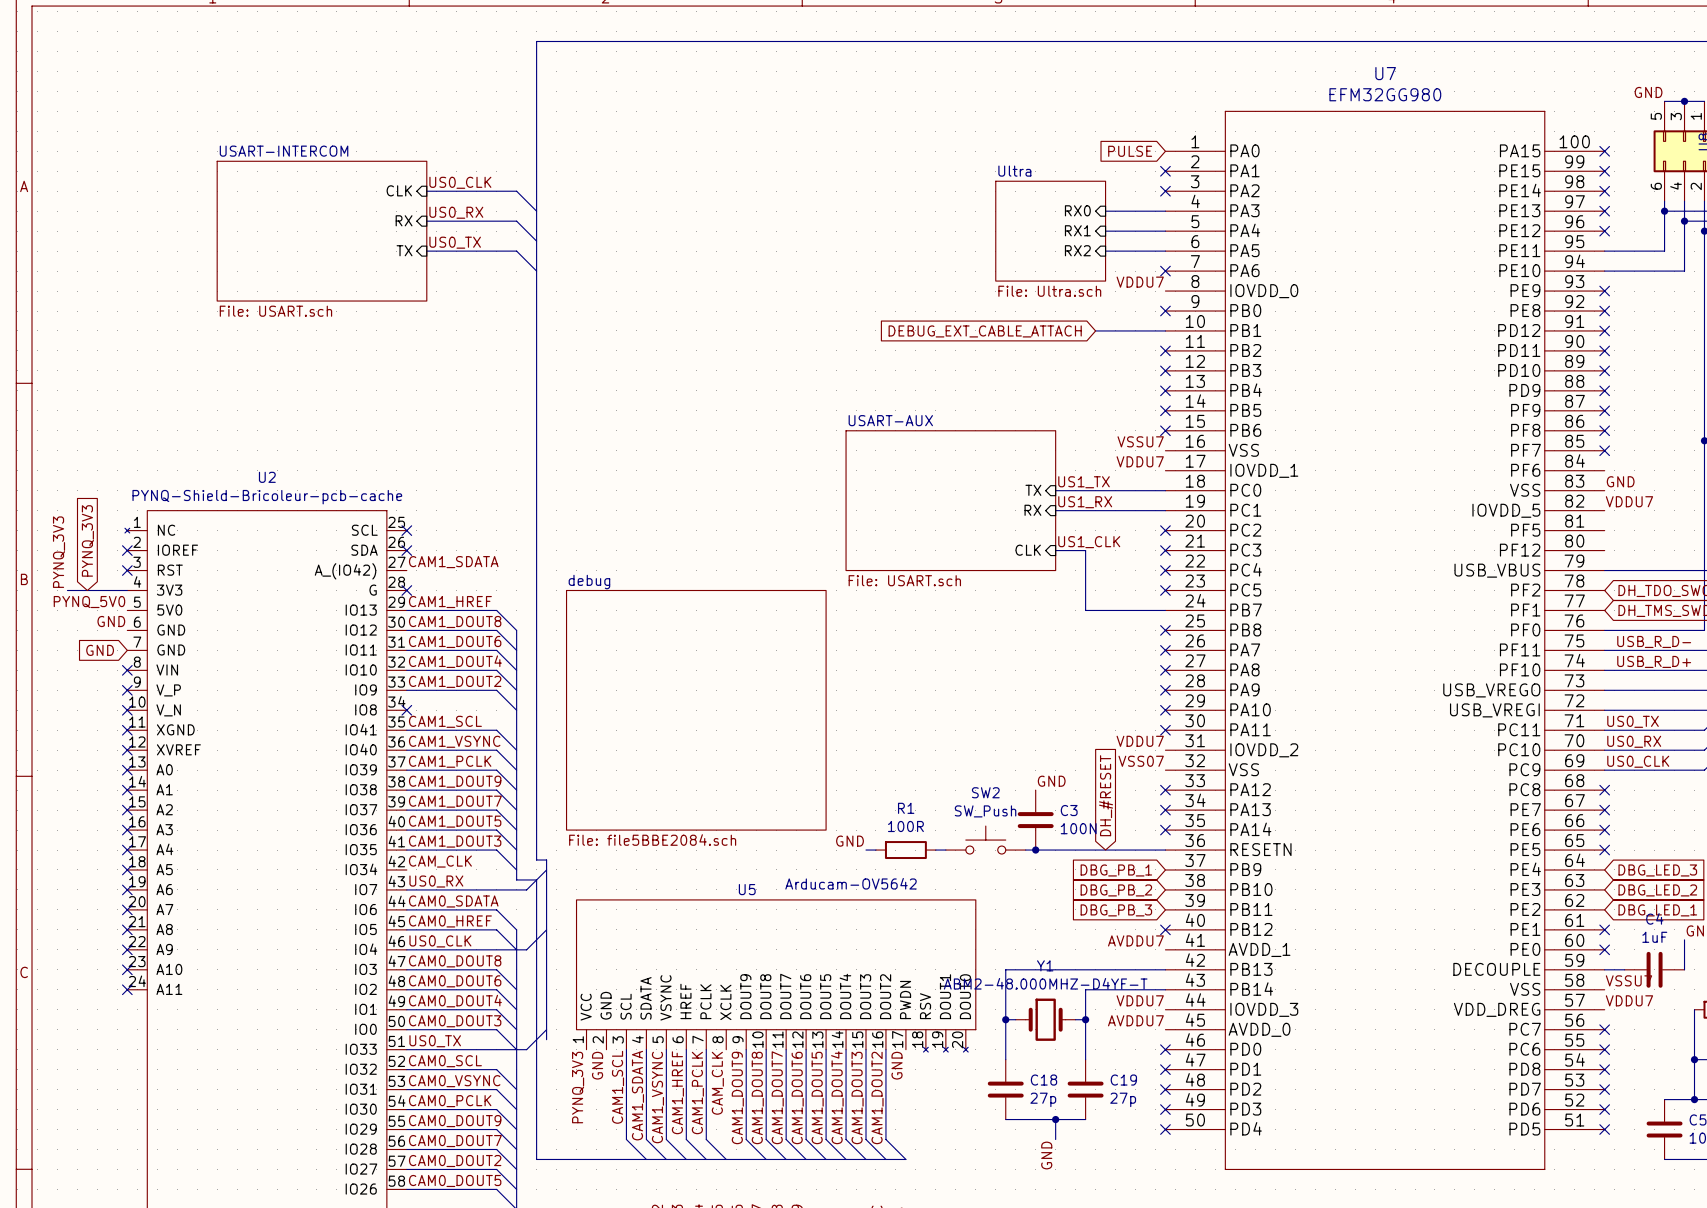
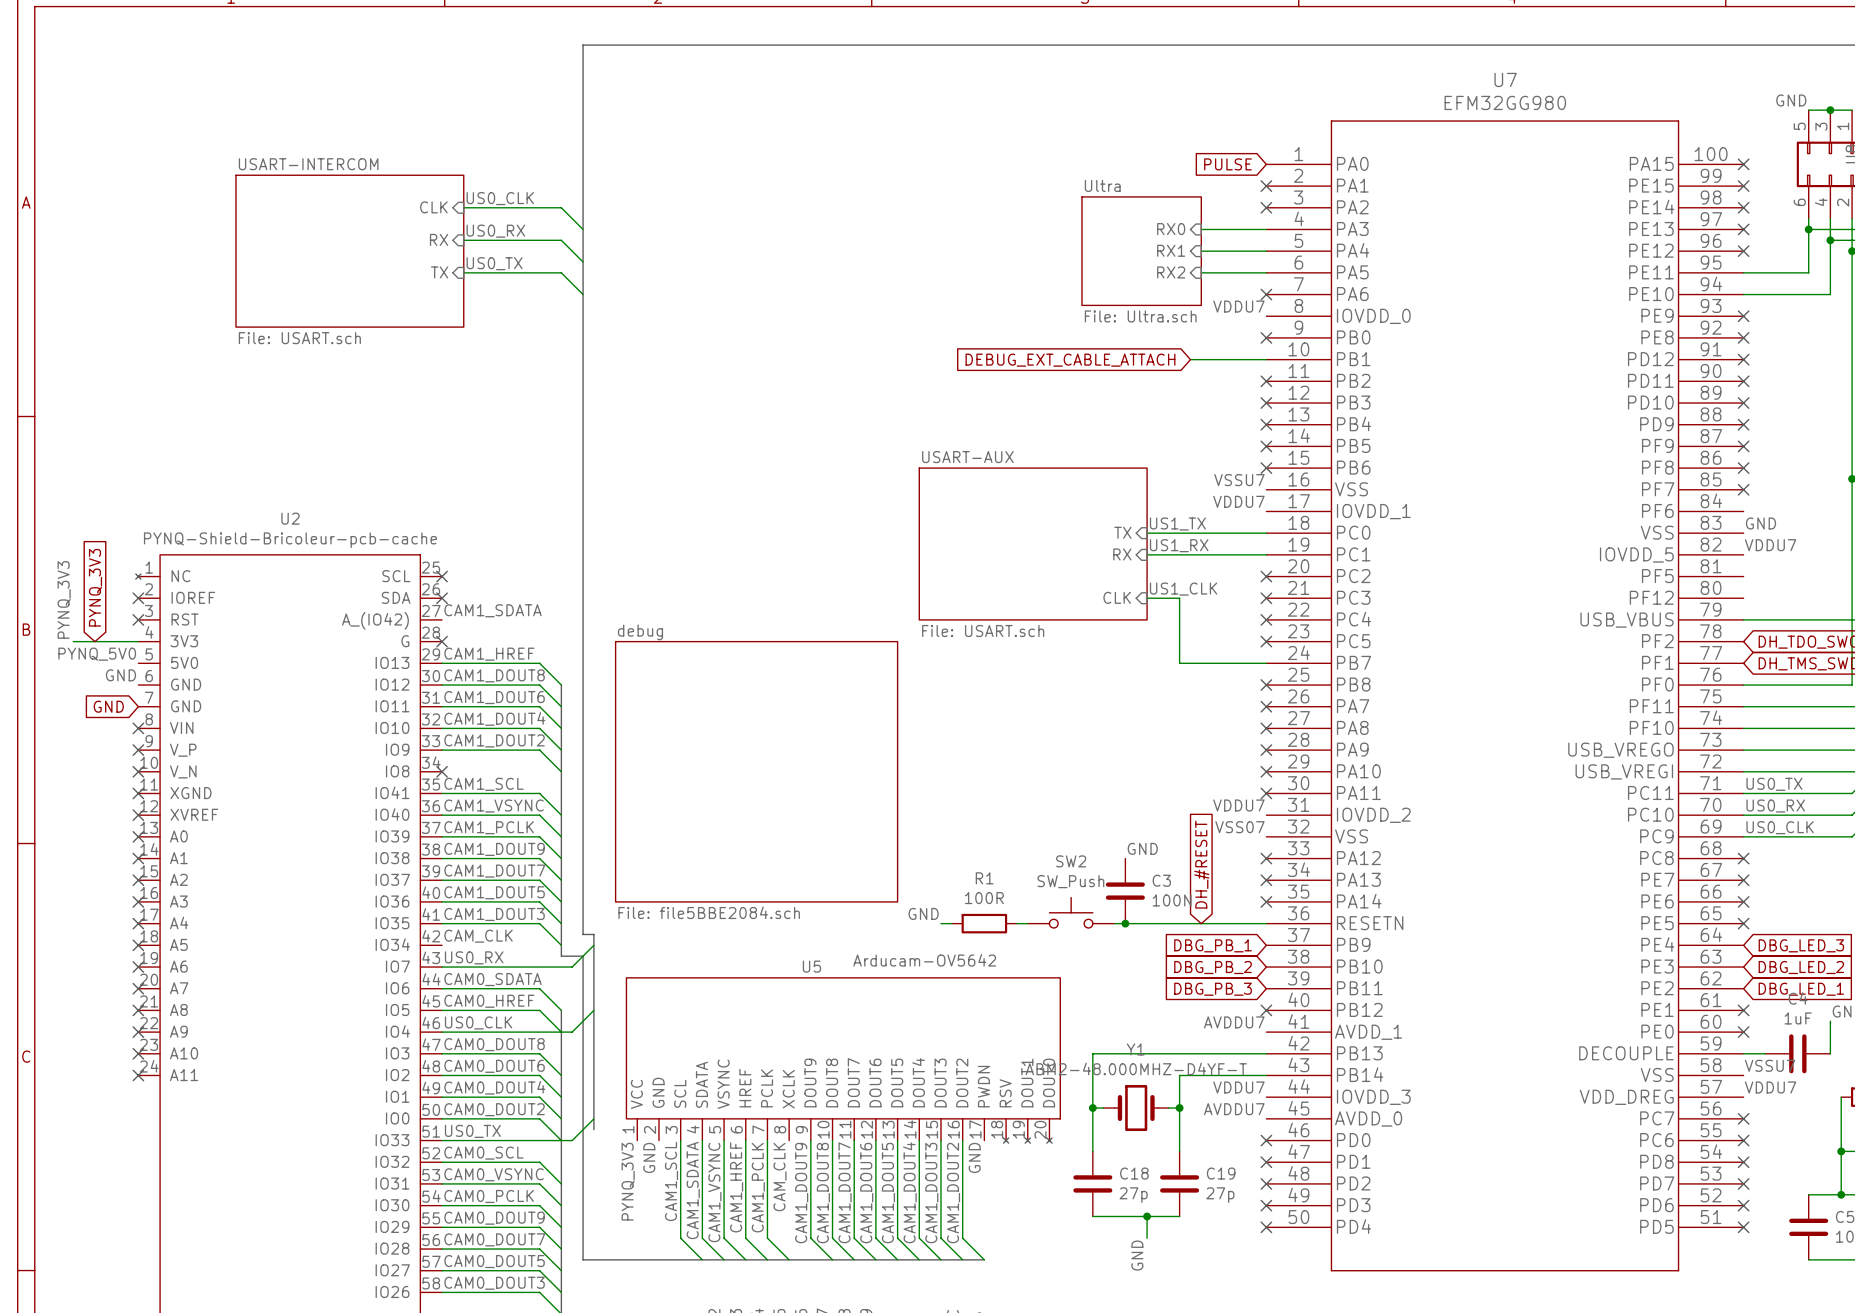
label: USB_R_D- (1654, 641) -> none
label: USB_R_D+ (1654, 661) -> none
label: CAM0_DOUT3 (455, 1021) -> CAM0_DOUT2 (494, 1109)
label: CAM0_DOUT2 (455, 1161) -> CAM0_DOUT5 (494, 1261)
label: CAM0_DOUT5 (455, 1180) -> CAM0_DOUT3 (494, 1283)

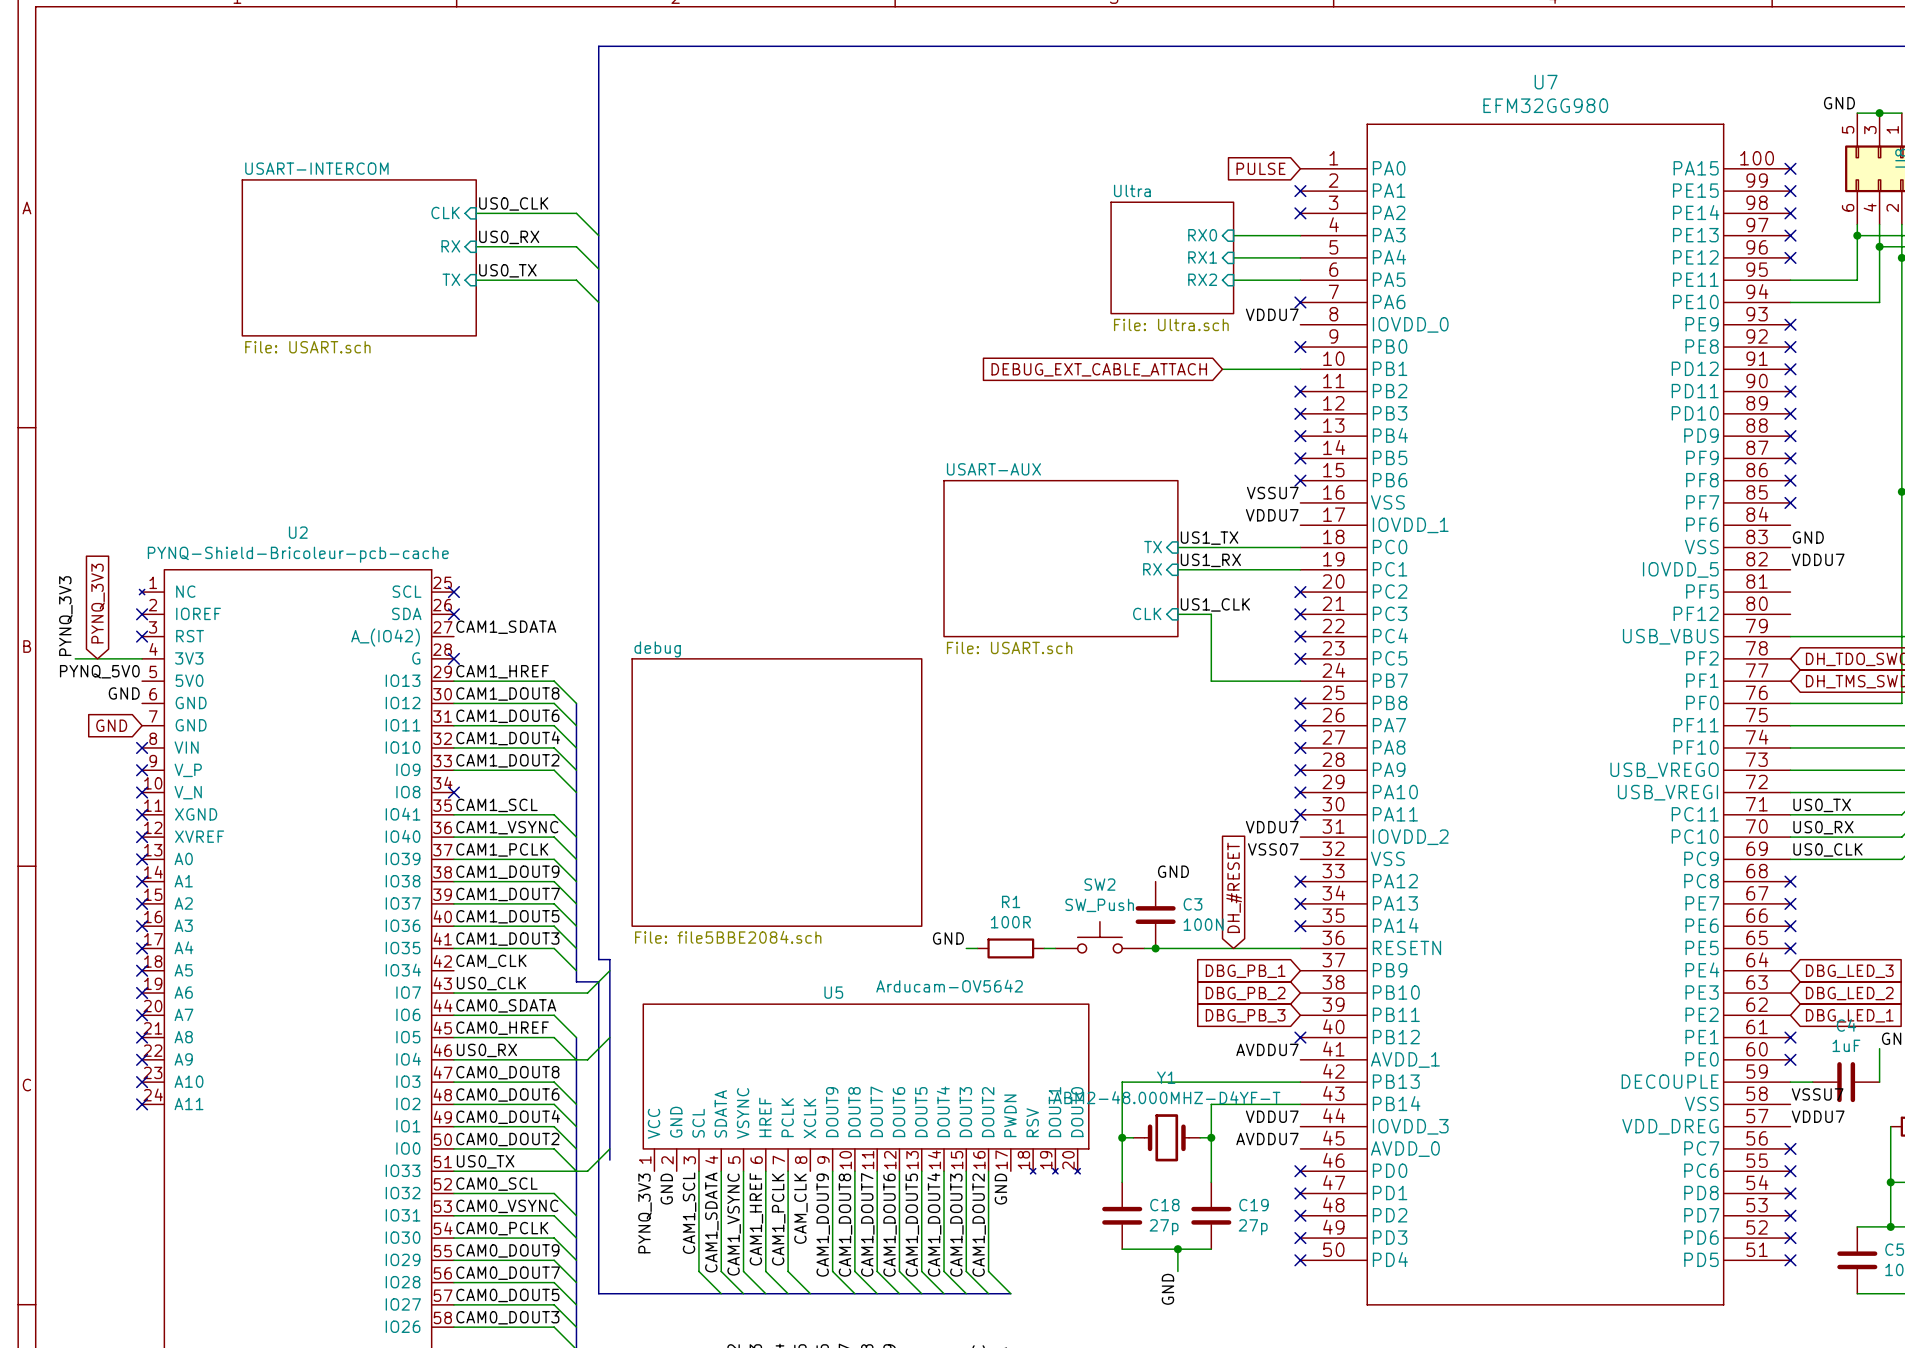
label: US0_RX (474, 957) -> US0_CLK (491, 983)
label: US0_CLK (478, 1022) -> US0_RX (486, 1050)

